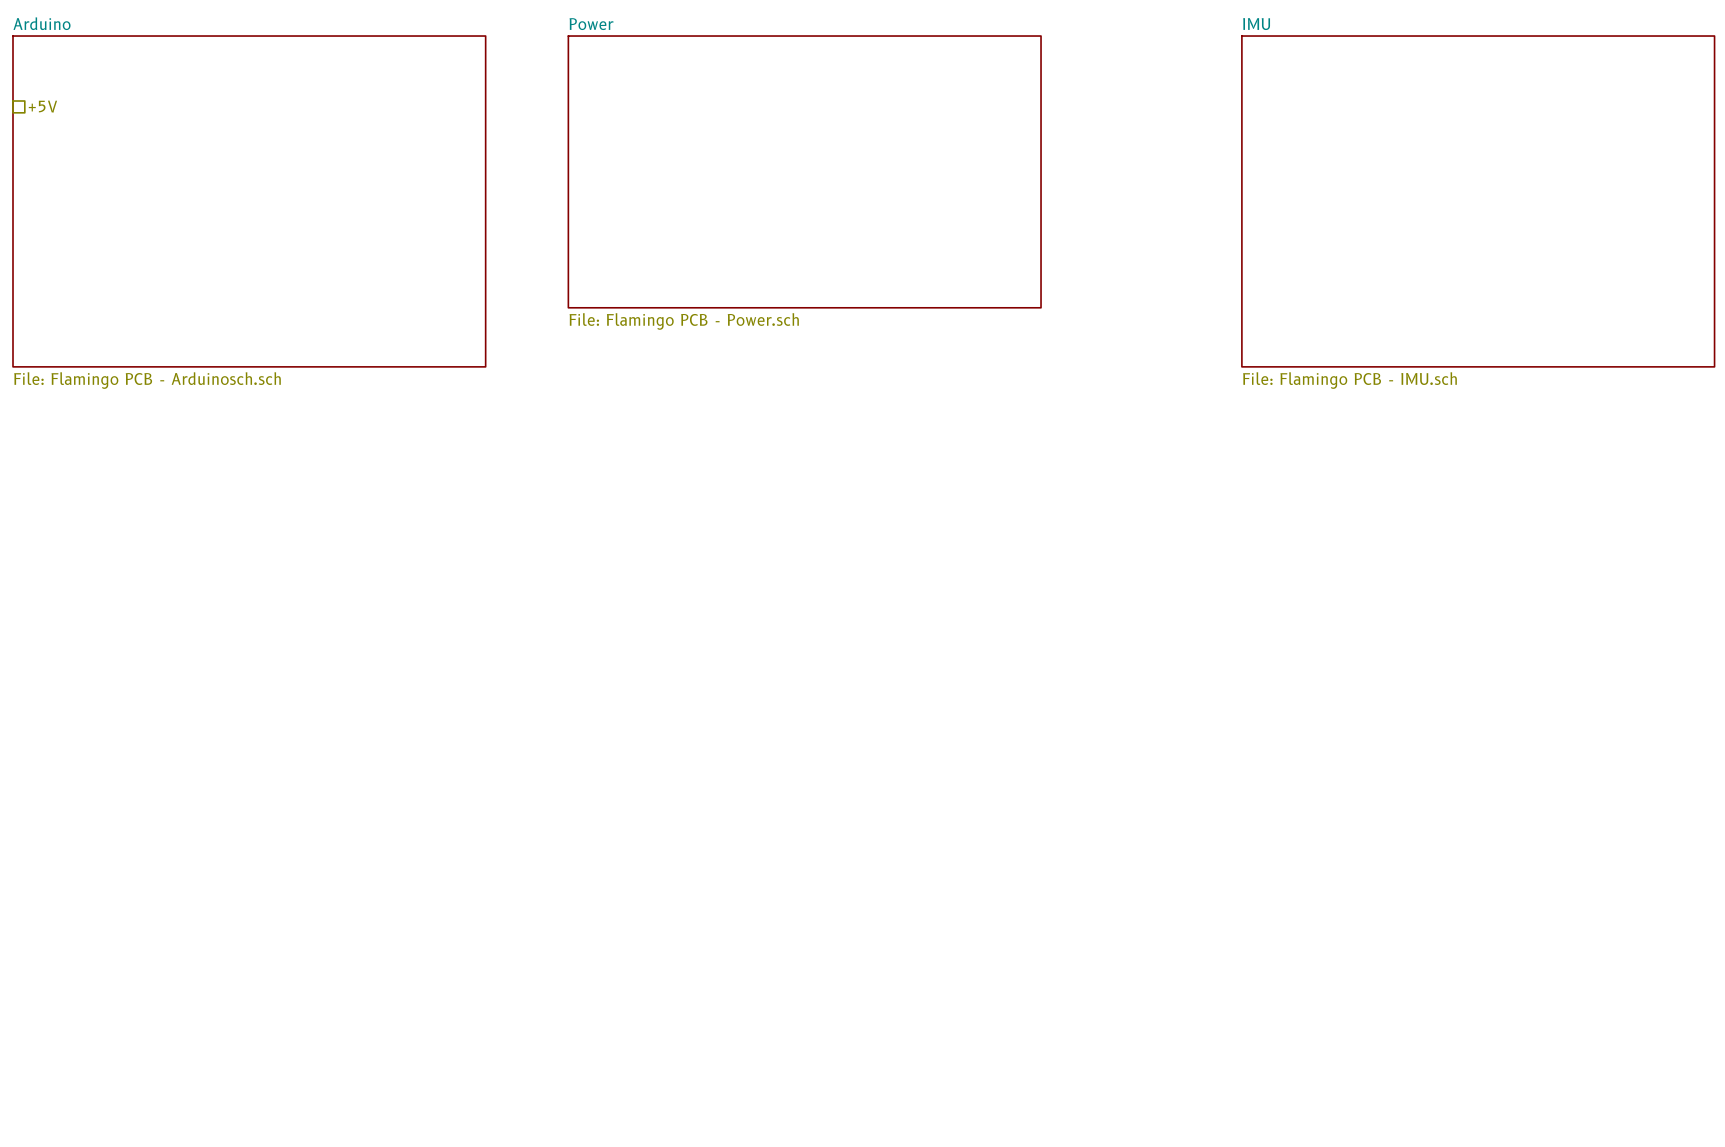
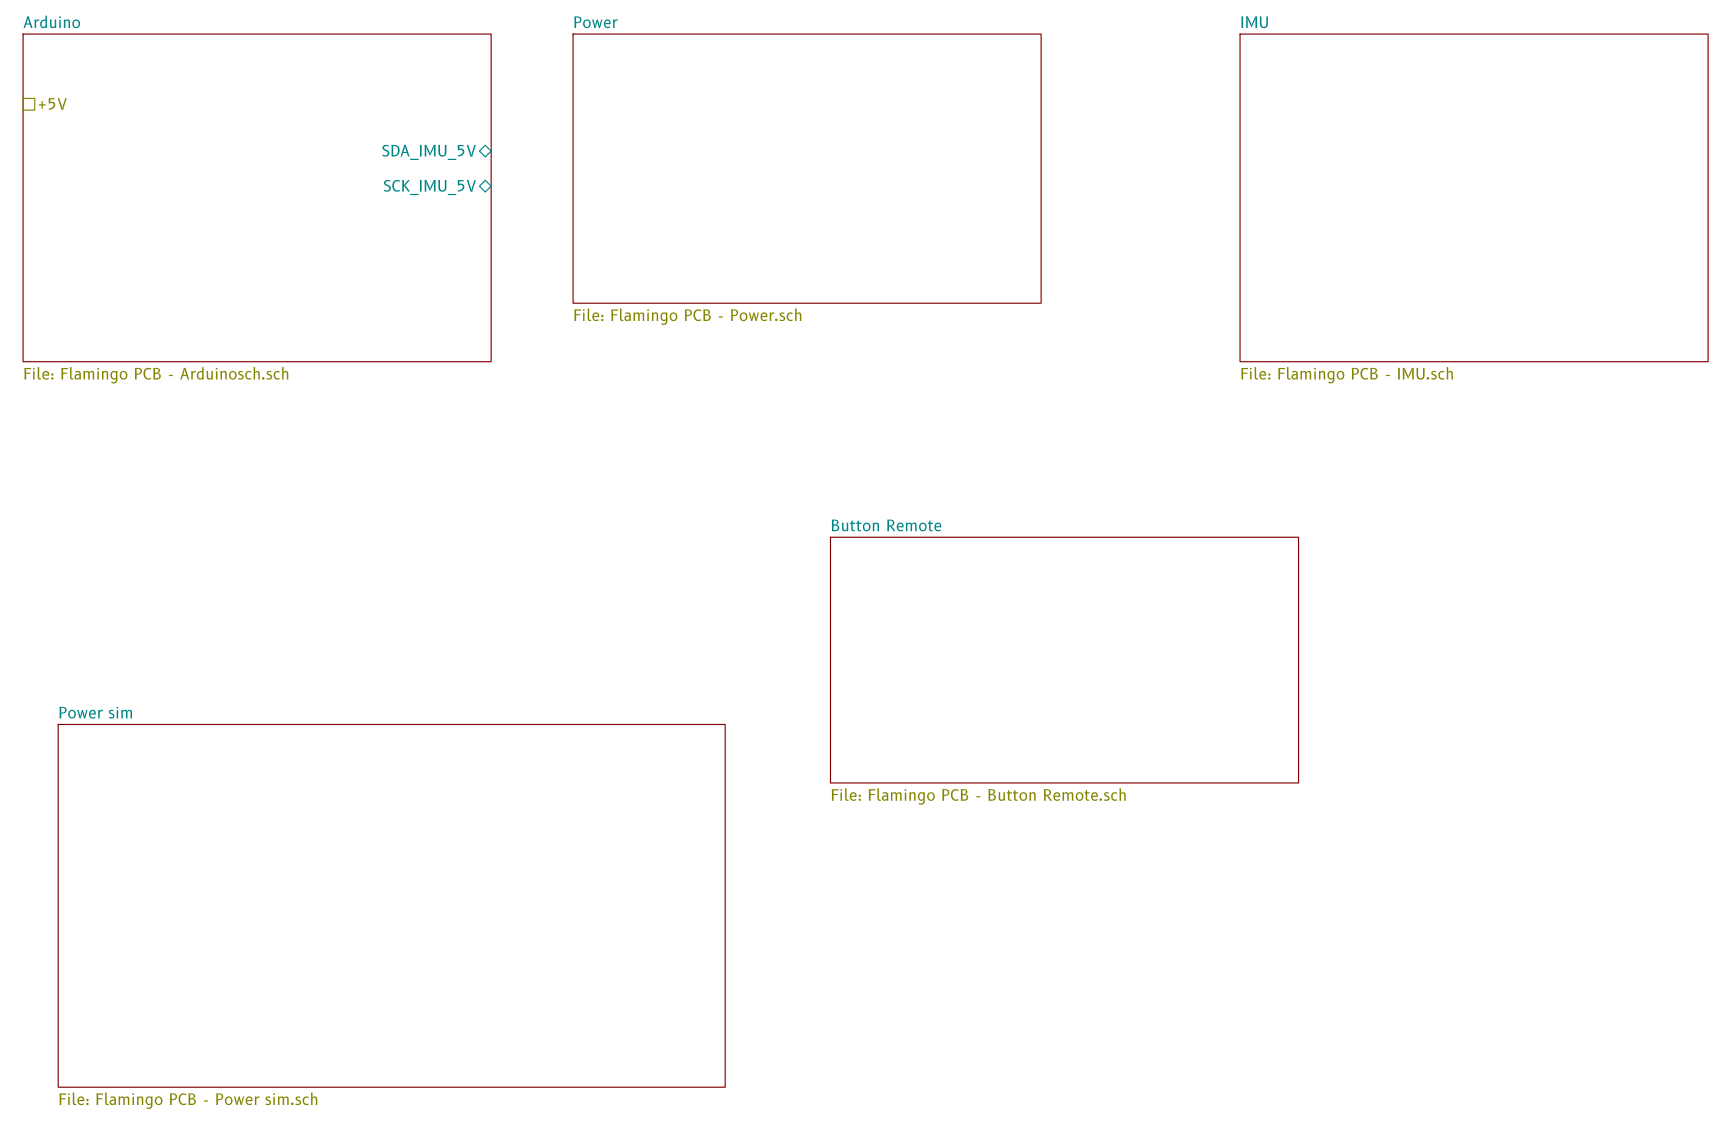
sheet pin: none -> SDA_IMU_5V (429, 152)
sheet pin: none -> SCK_IMU_5V (429, 187)
sheet Button Remote: none -> File: Flamingo PCB - Button Remote.sch (1064, 660)
sheet Power sim: none -> File: Flamingo PCB - Power sim.sch (391, 905)

